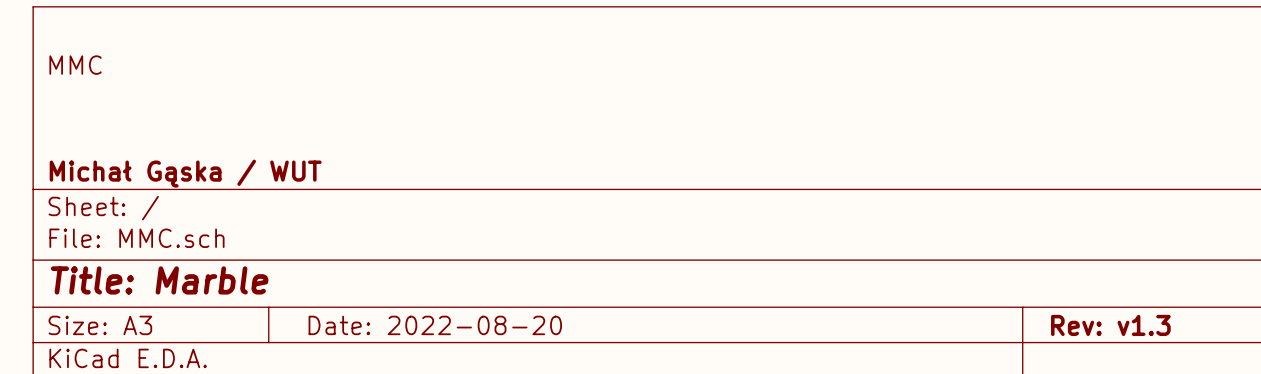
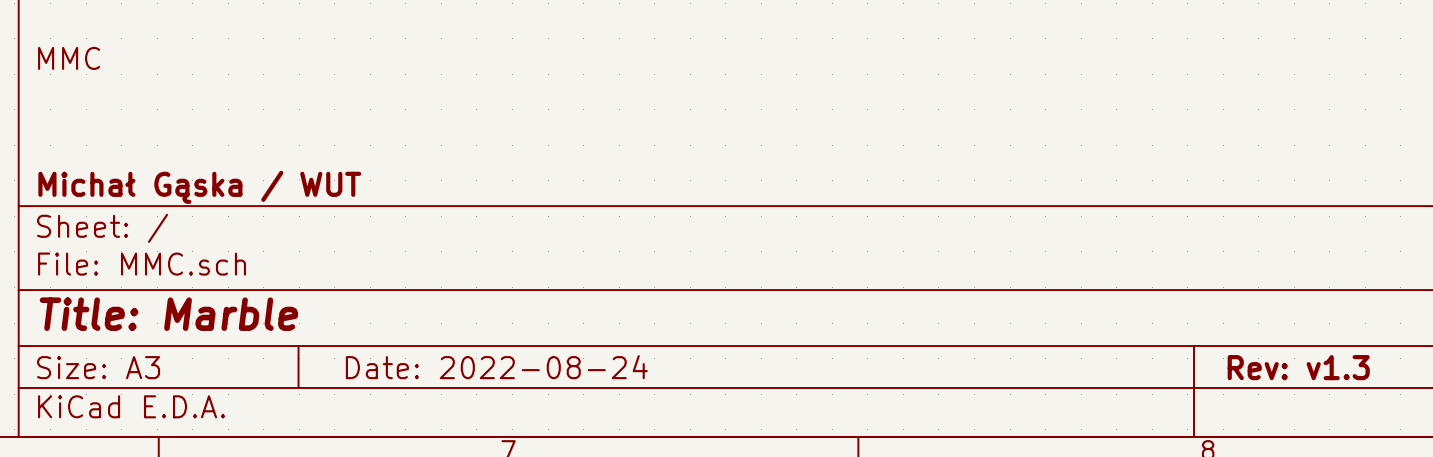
title block: Date: 2022-08-20 (435, 325) -> Date: 2022-08-24 (496, 367)

